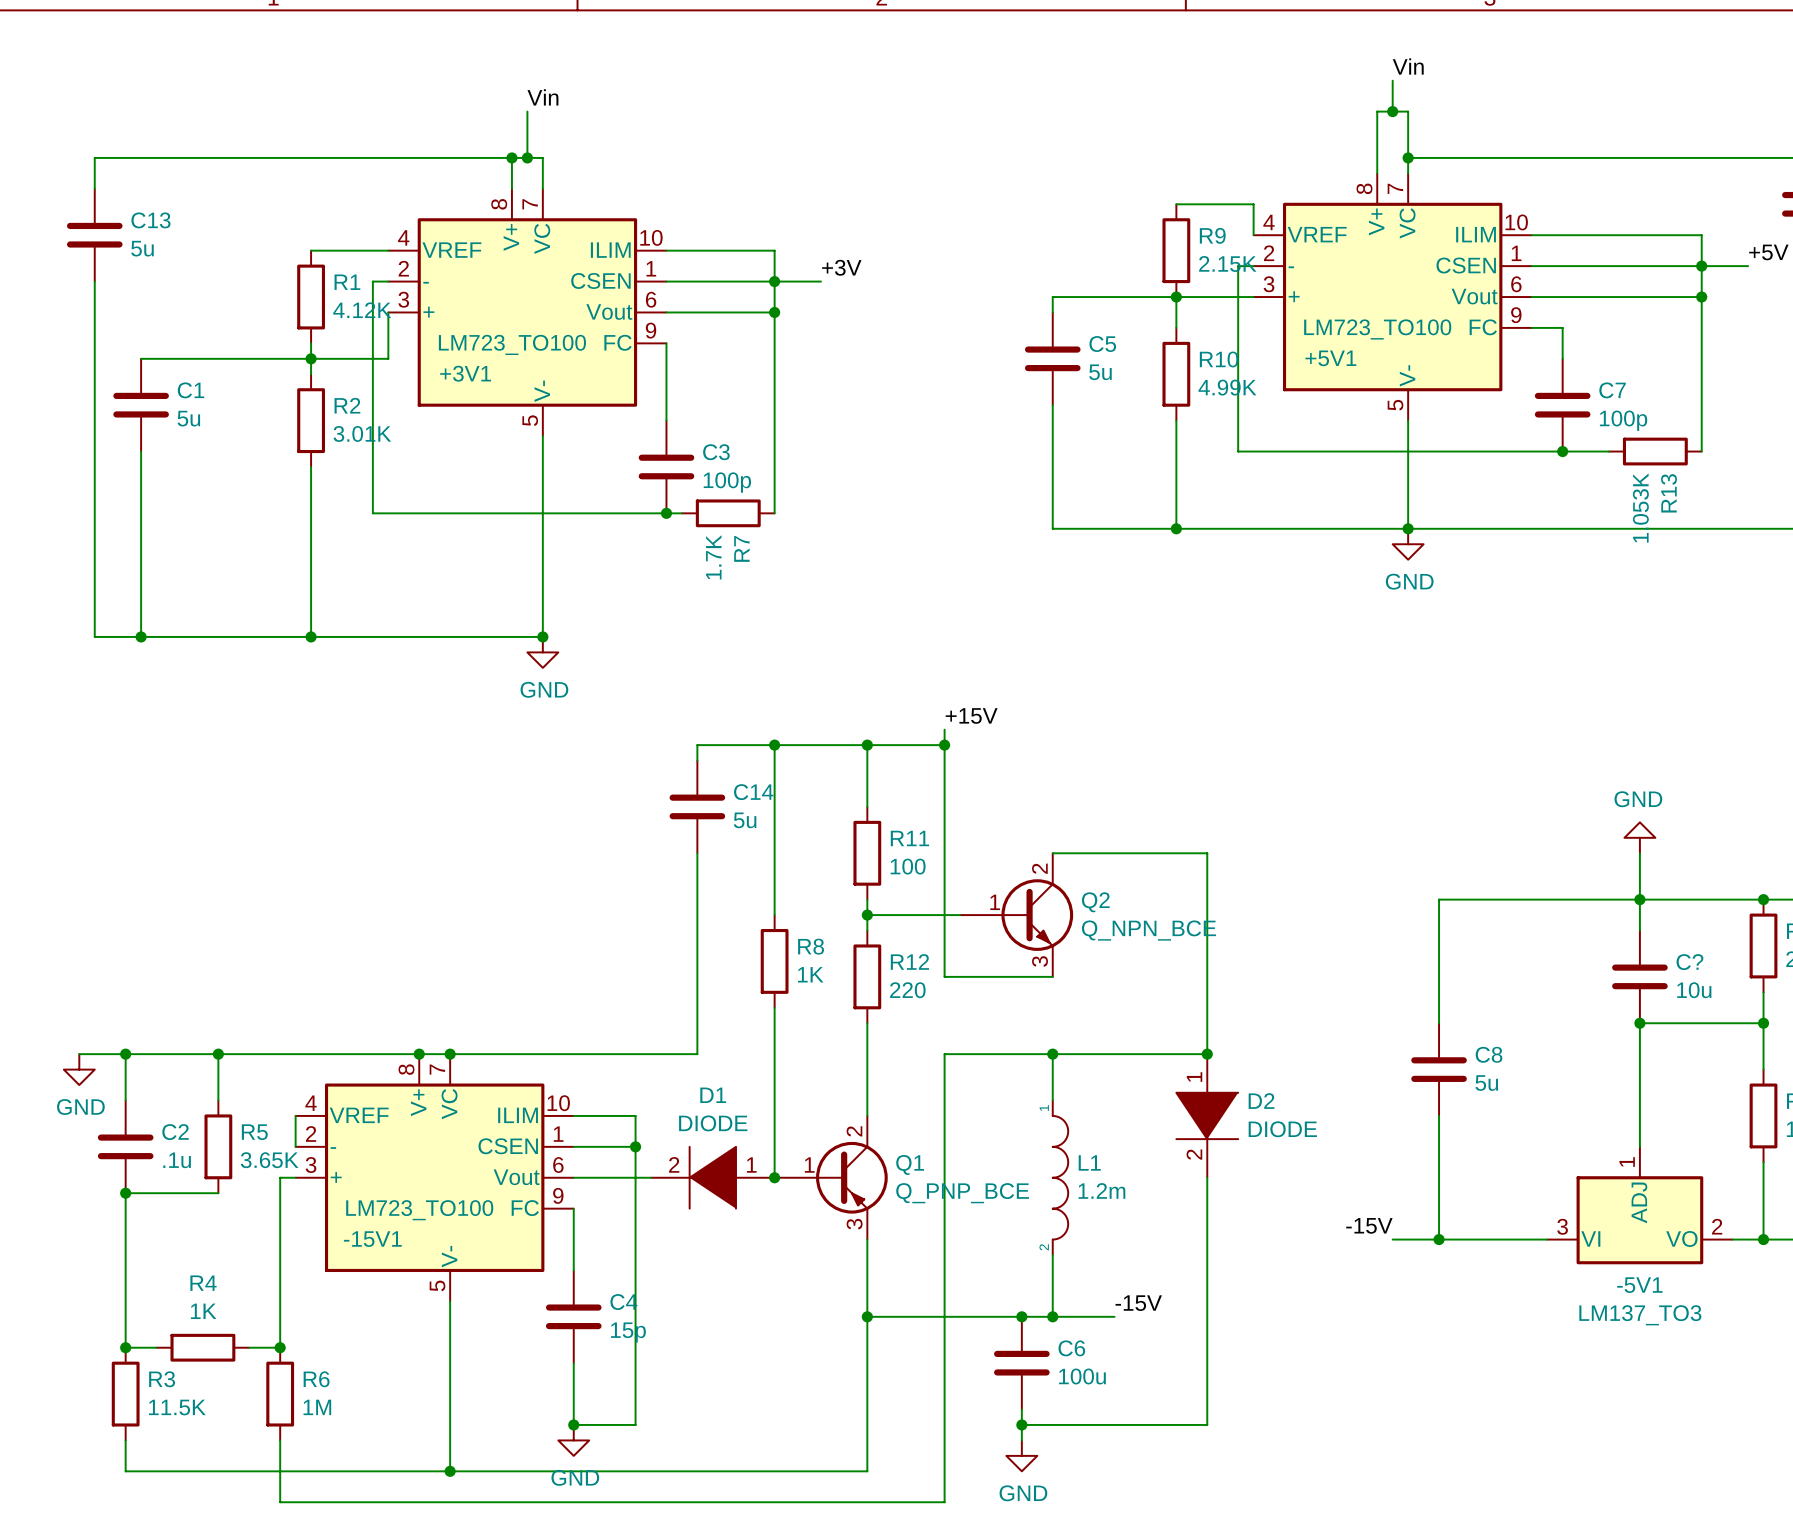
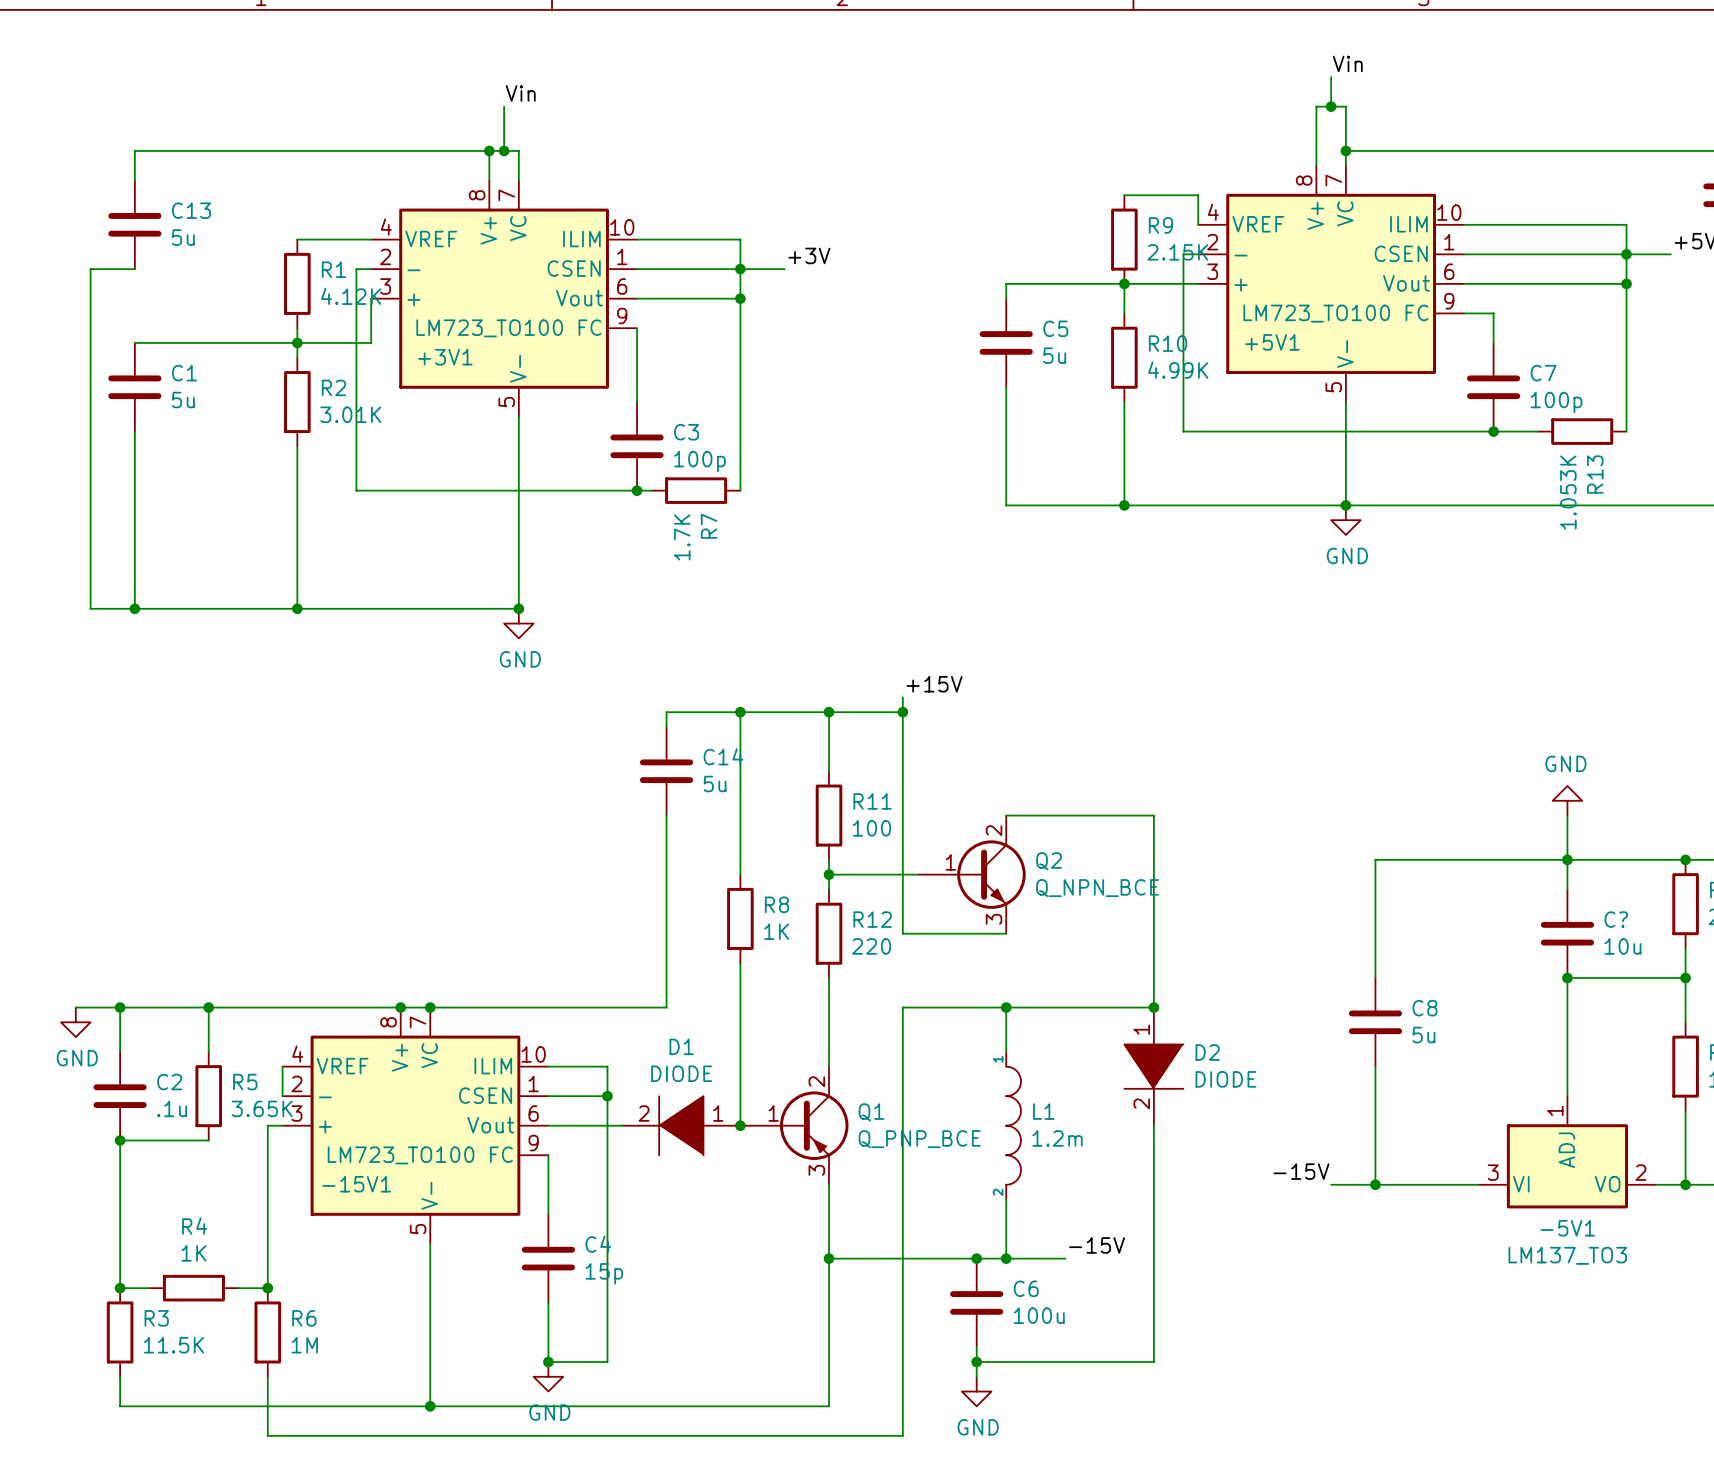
wire: (141, 157) (94, 157) (94, 188) -> (134, 150) (134, 180)
C13 position: (94, 235) -> (134, 224)
wire: none -> (90, 269) (134, 269)

